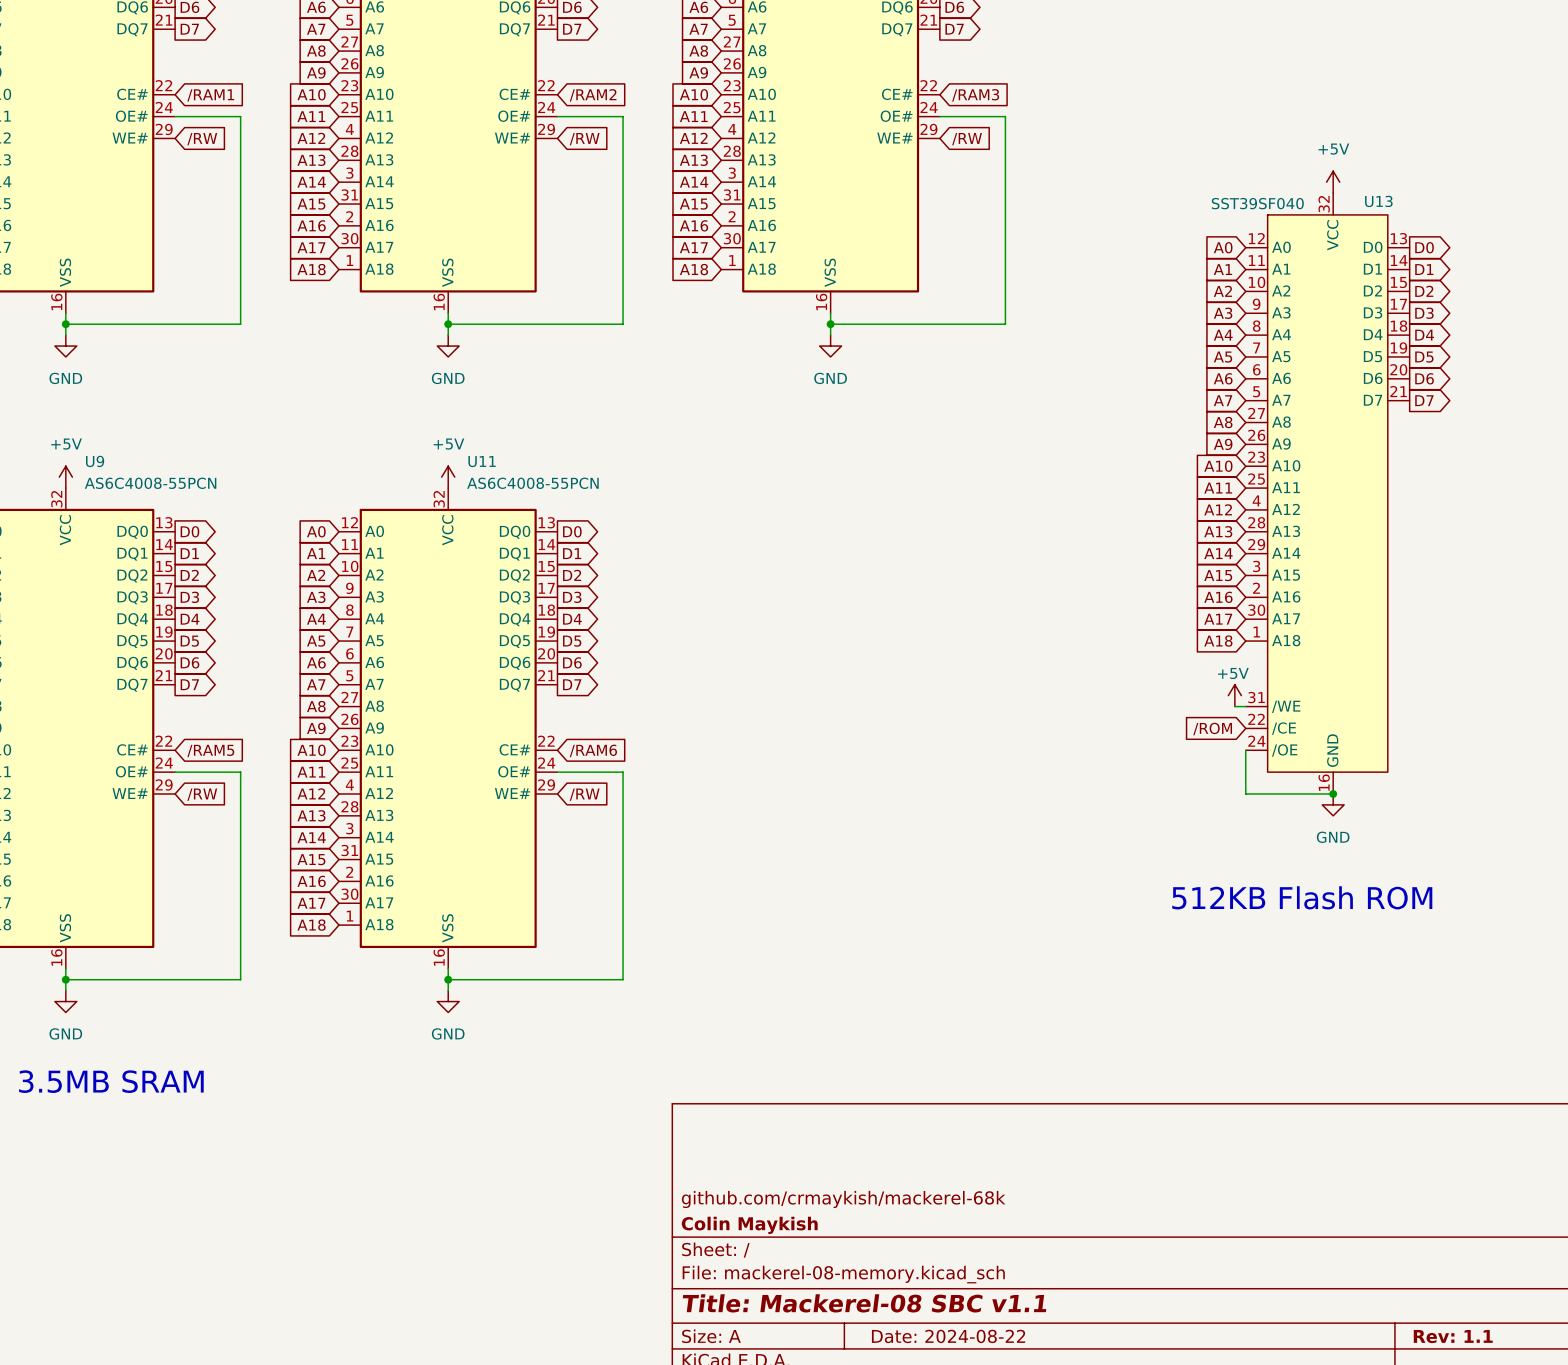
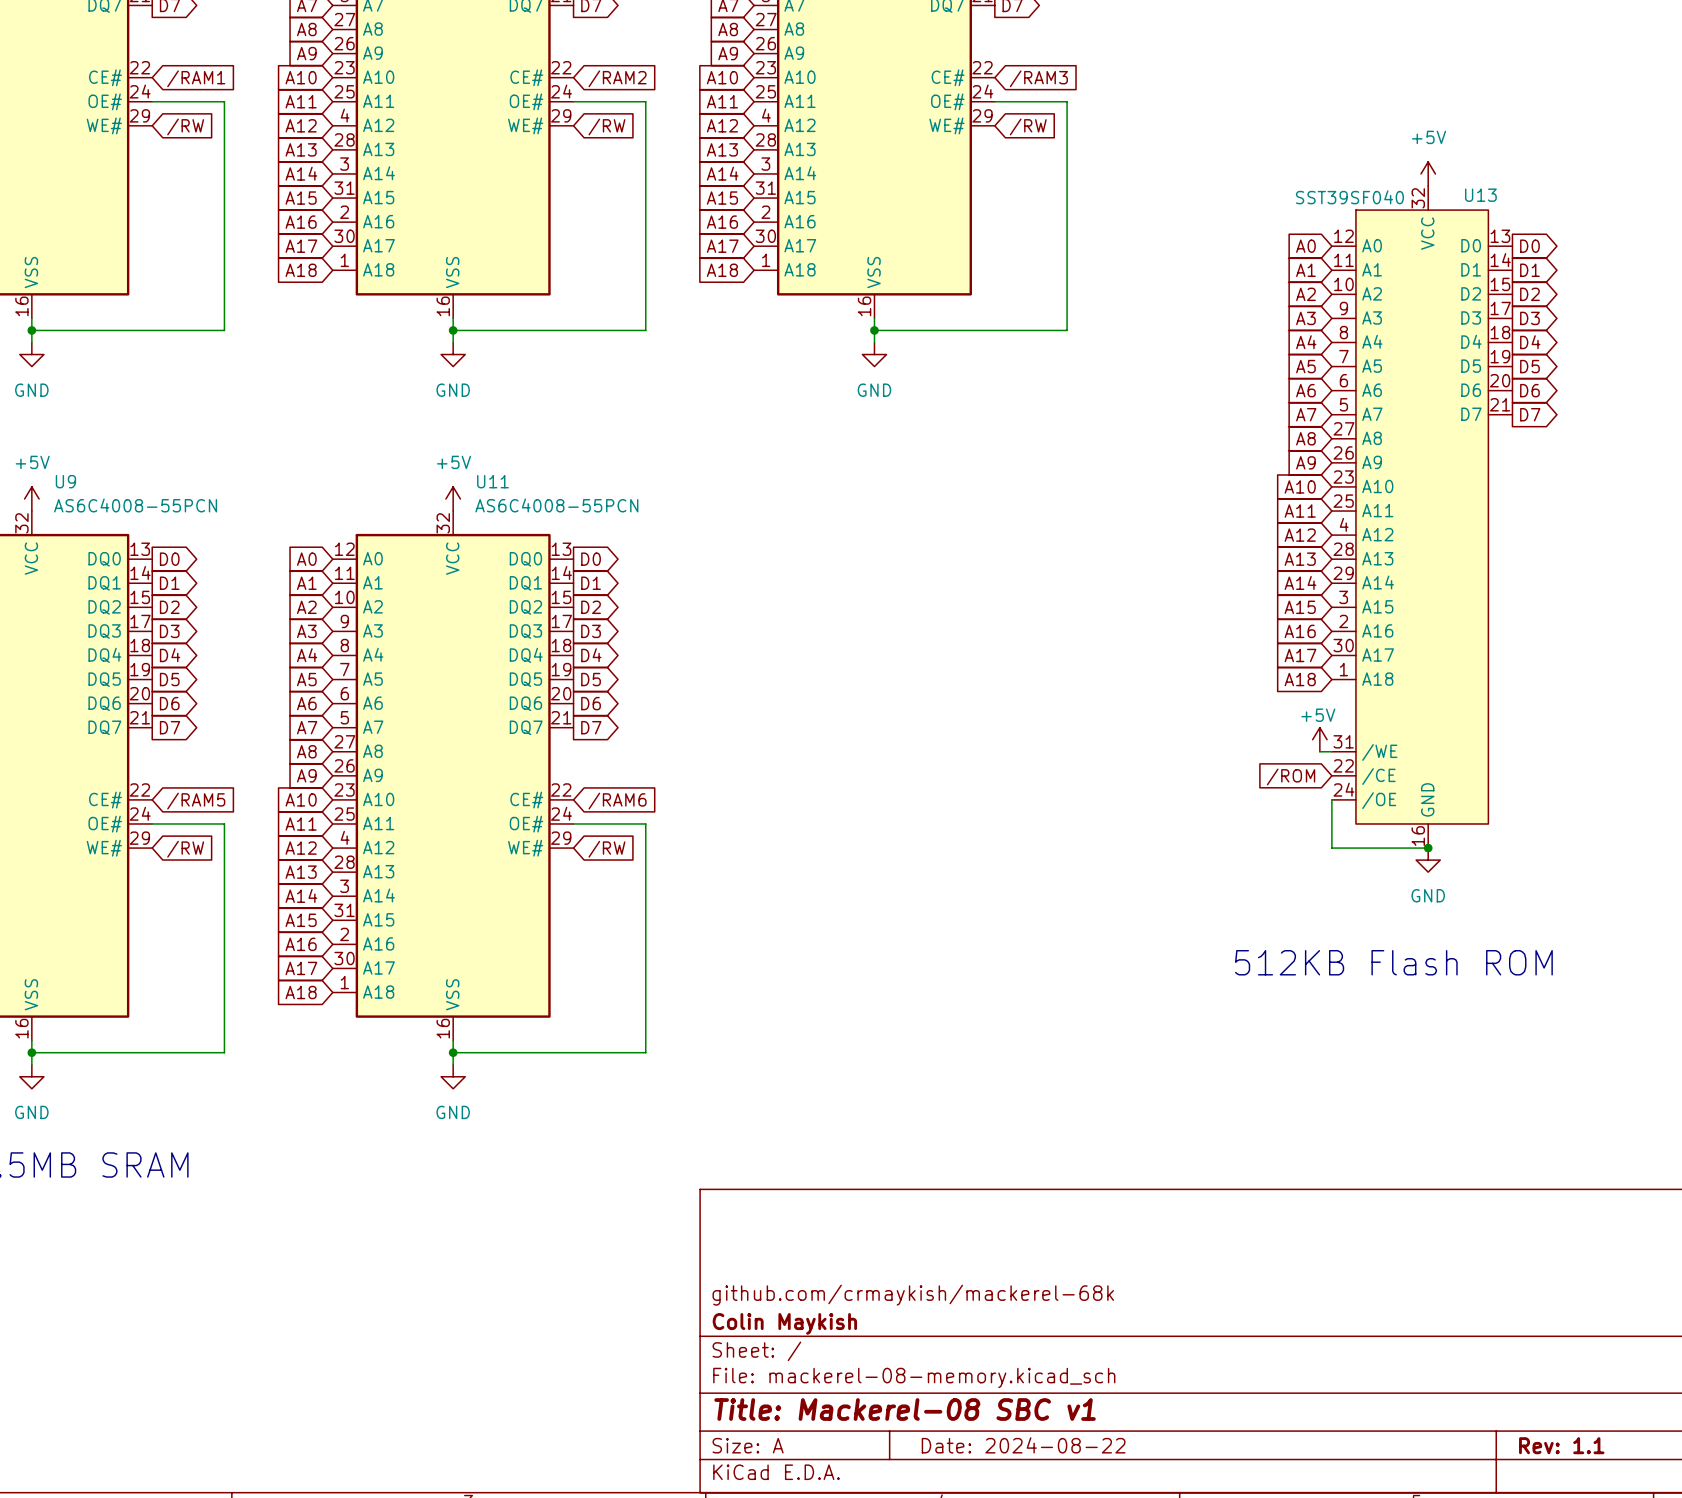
title block: Title: Mackerel-08 SBC v1.1 (864, 1303) -> Title: Mackerel-08 SBC v1 (905, 1409)

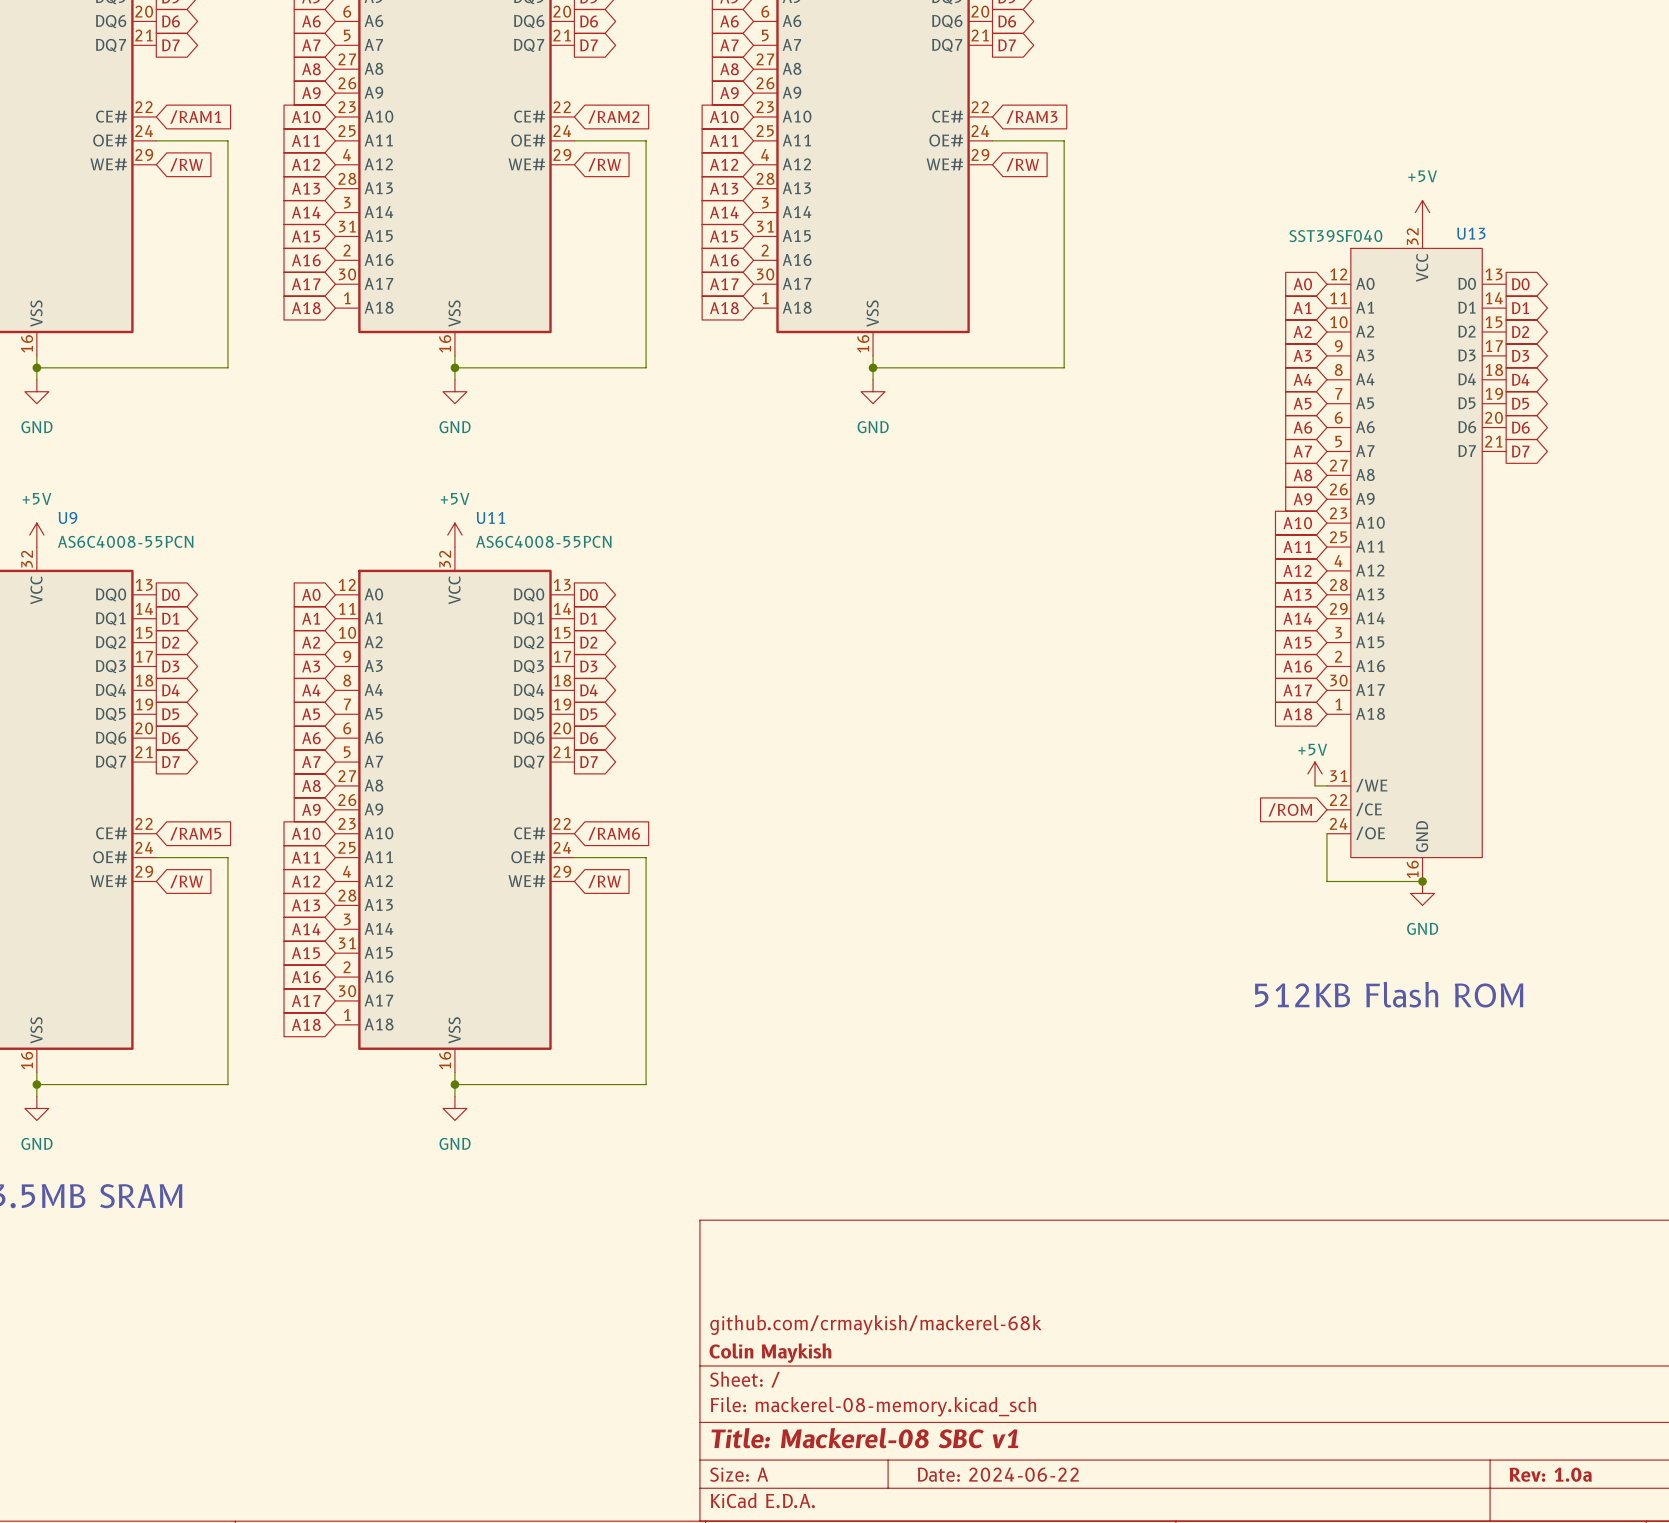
title block: Date: 2024-08-22 (1023, 1445) -> Date: 2024-06-22 (998, 1474)
title block: Rev: 1.1 (1561, 1445) -> Rev: 1.0a (1550, 1474)

